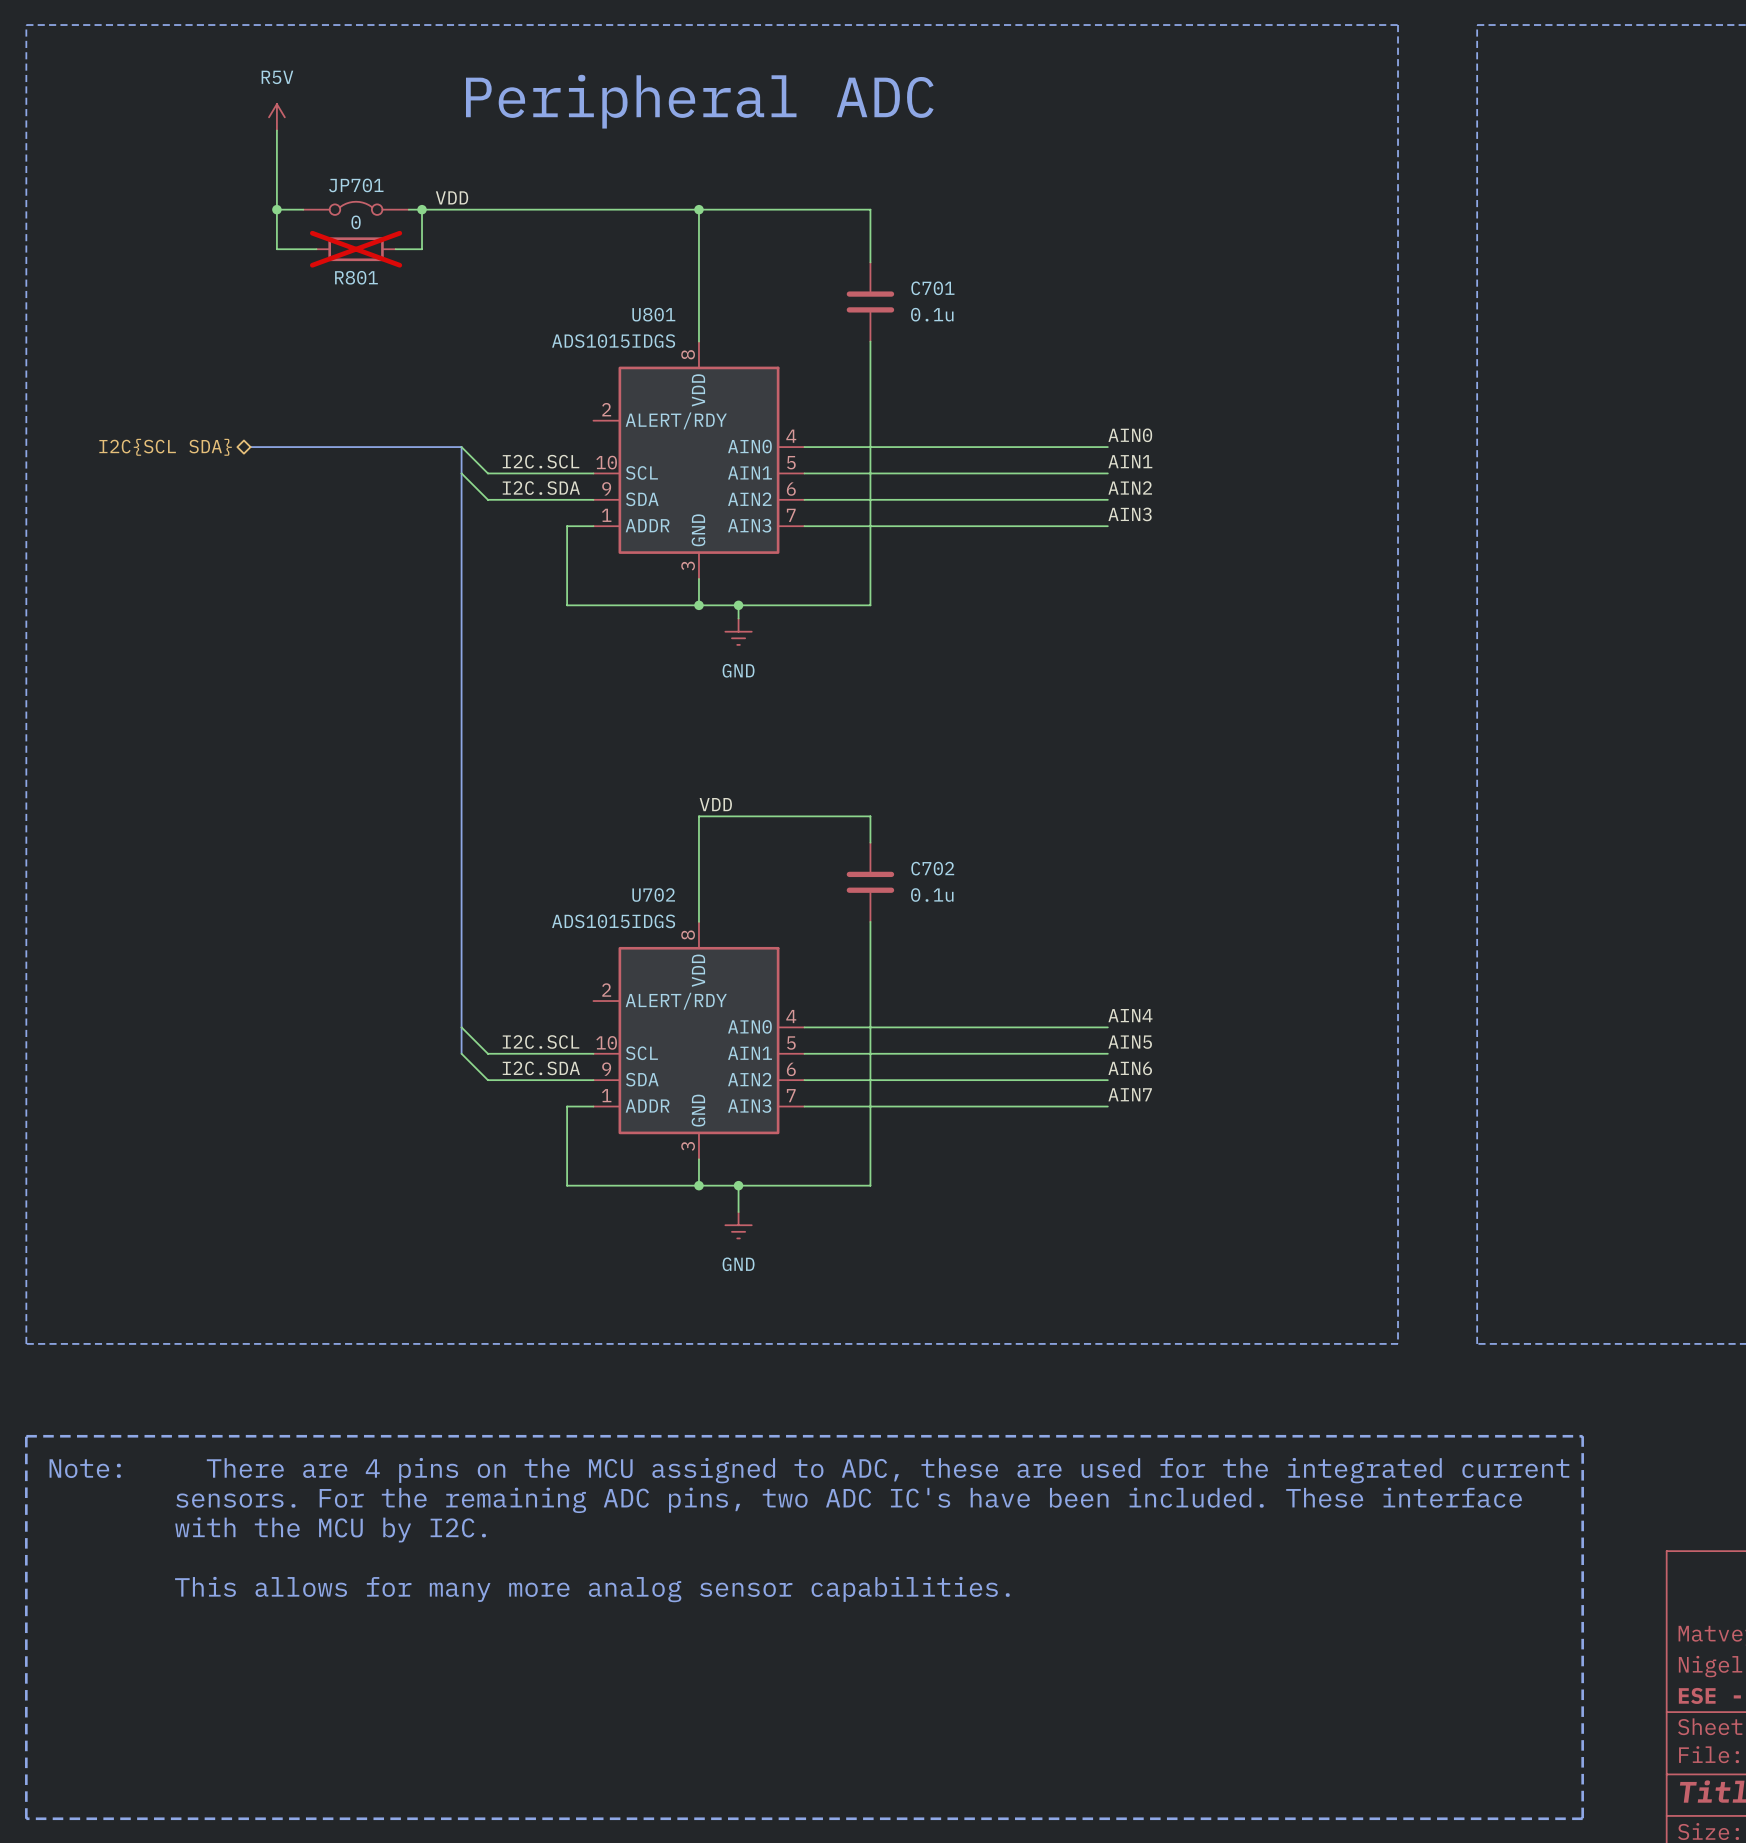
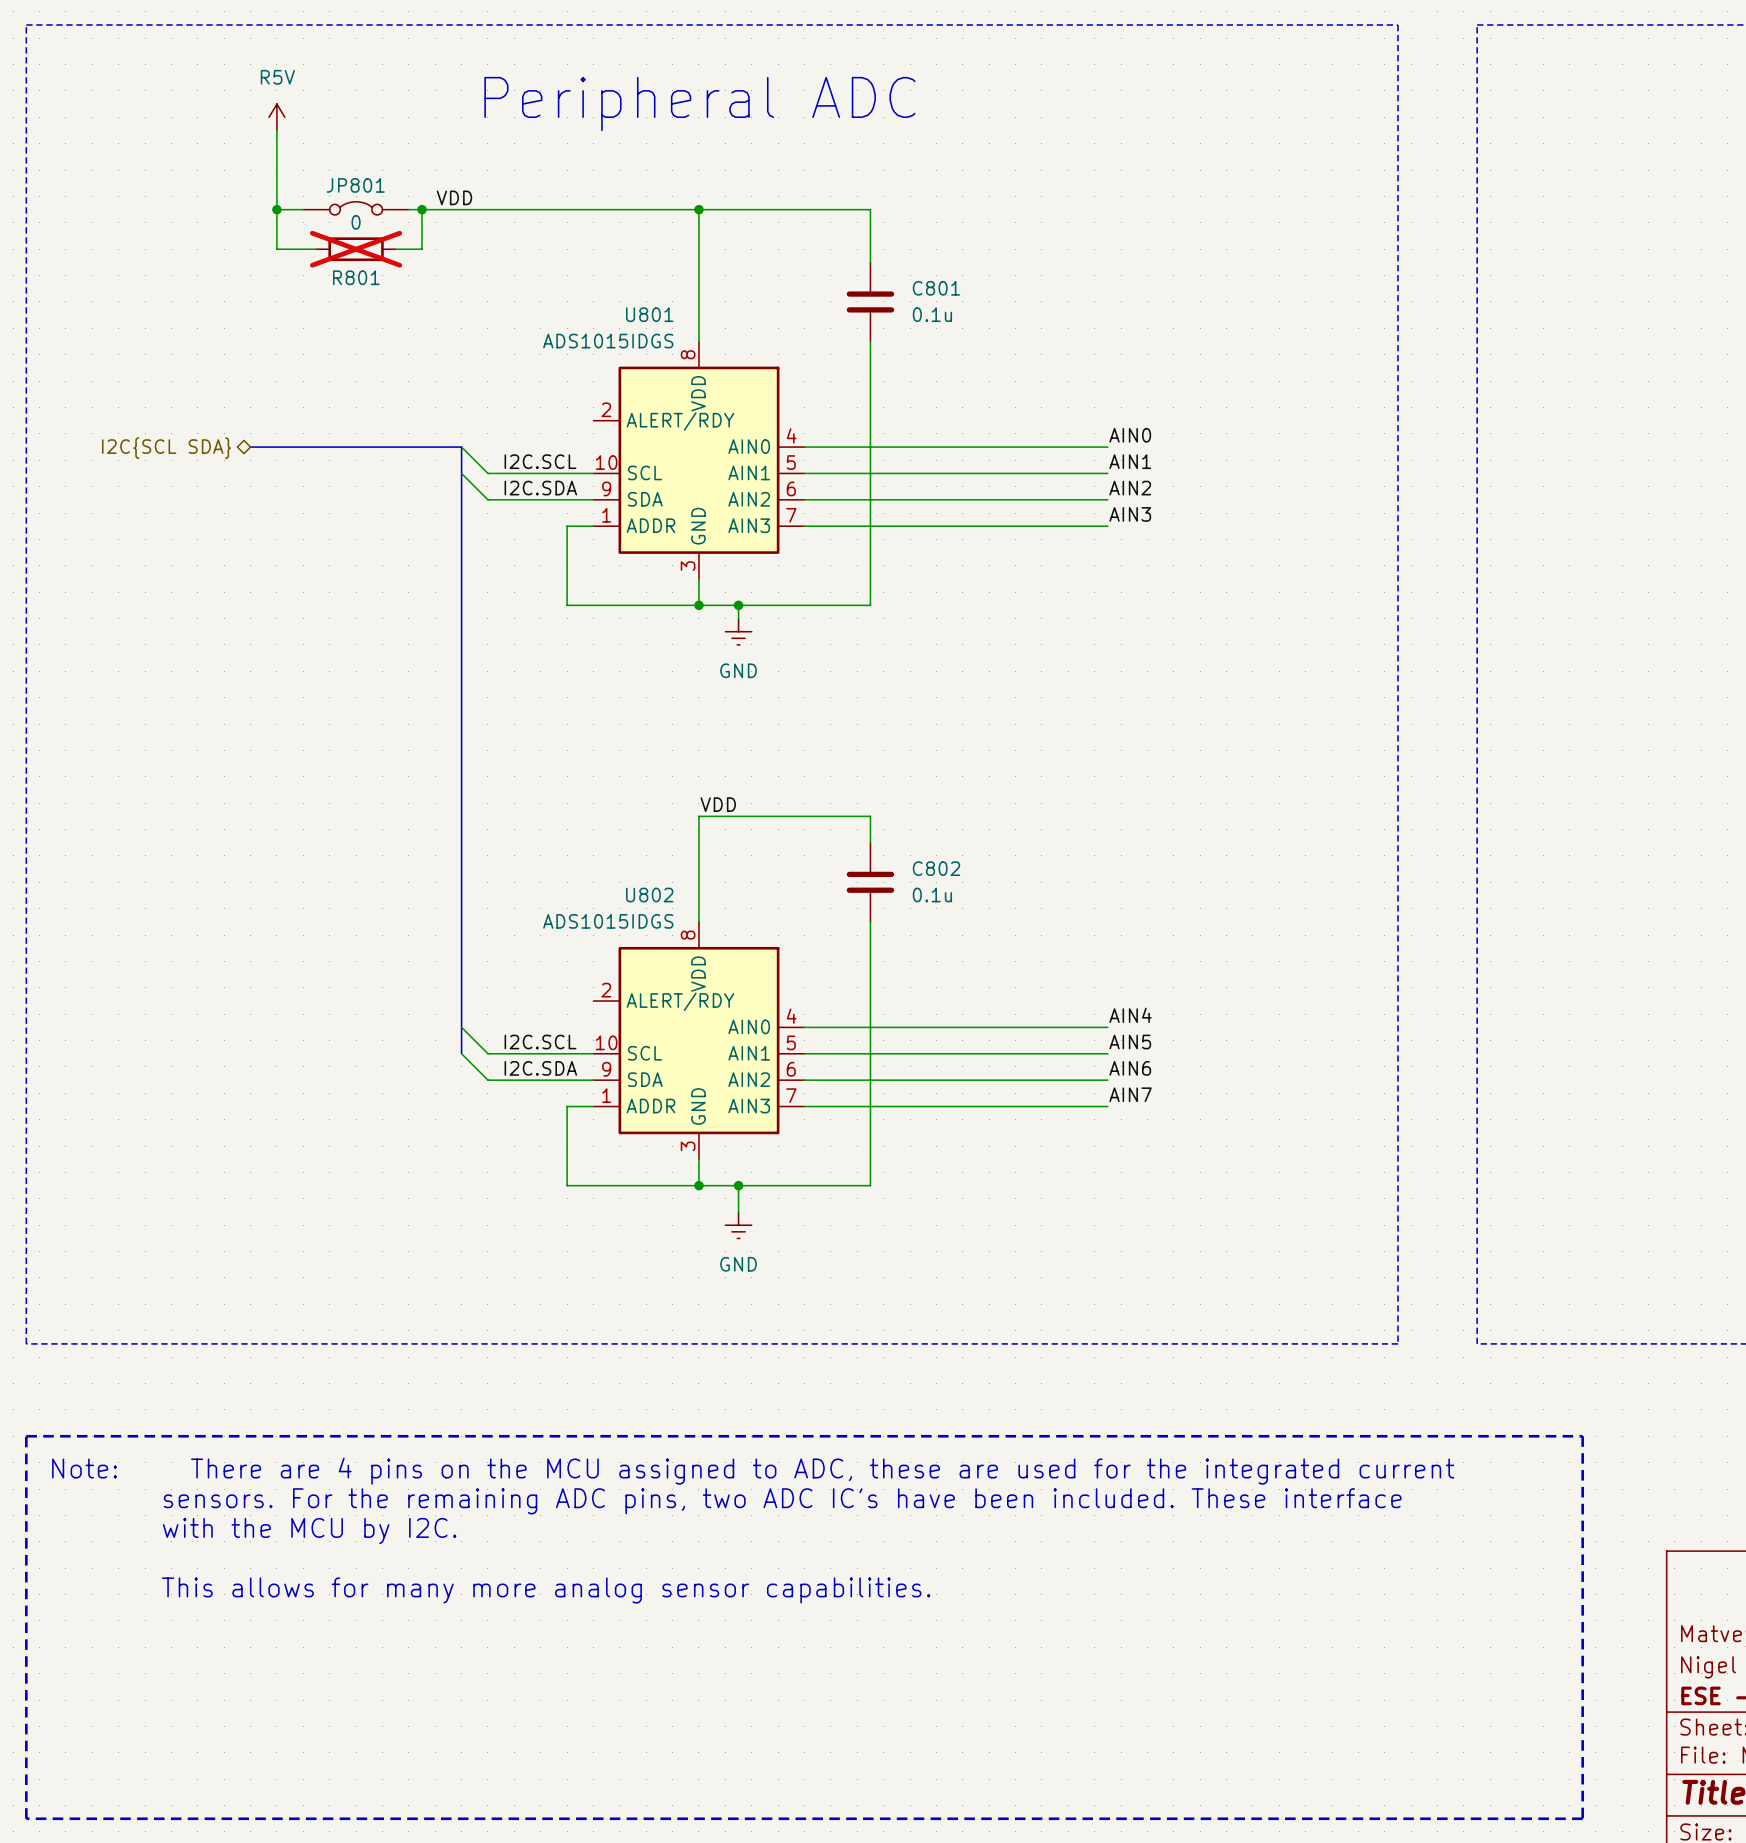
JP701 name: JP701 (356, 185) -> JP801 (355, 185)
C701 name: C701 (932, 288) -> C801 (936, 288)
C702 name: C702 (932, 868) -> C802 (936, 868)
U702 name: U702 (653, 895) -> U802 (649, 895)

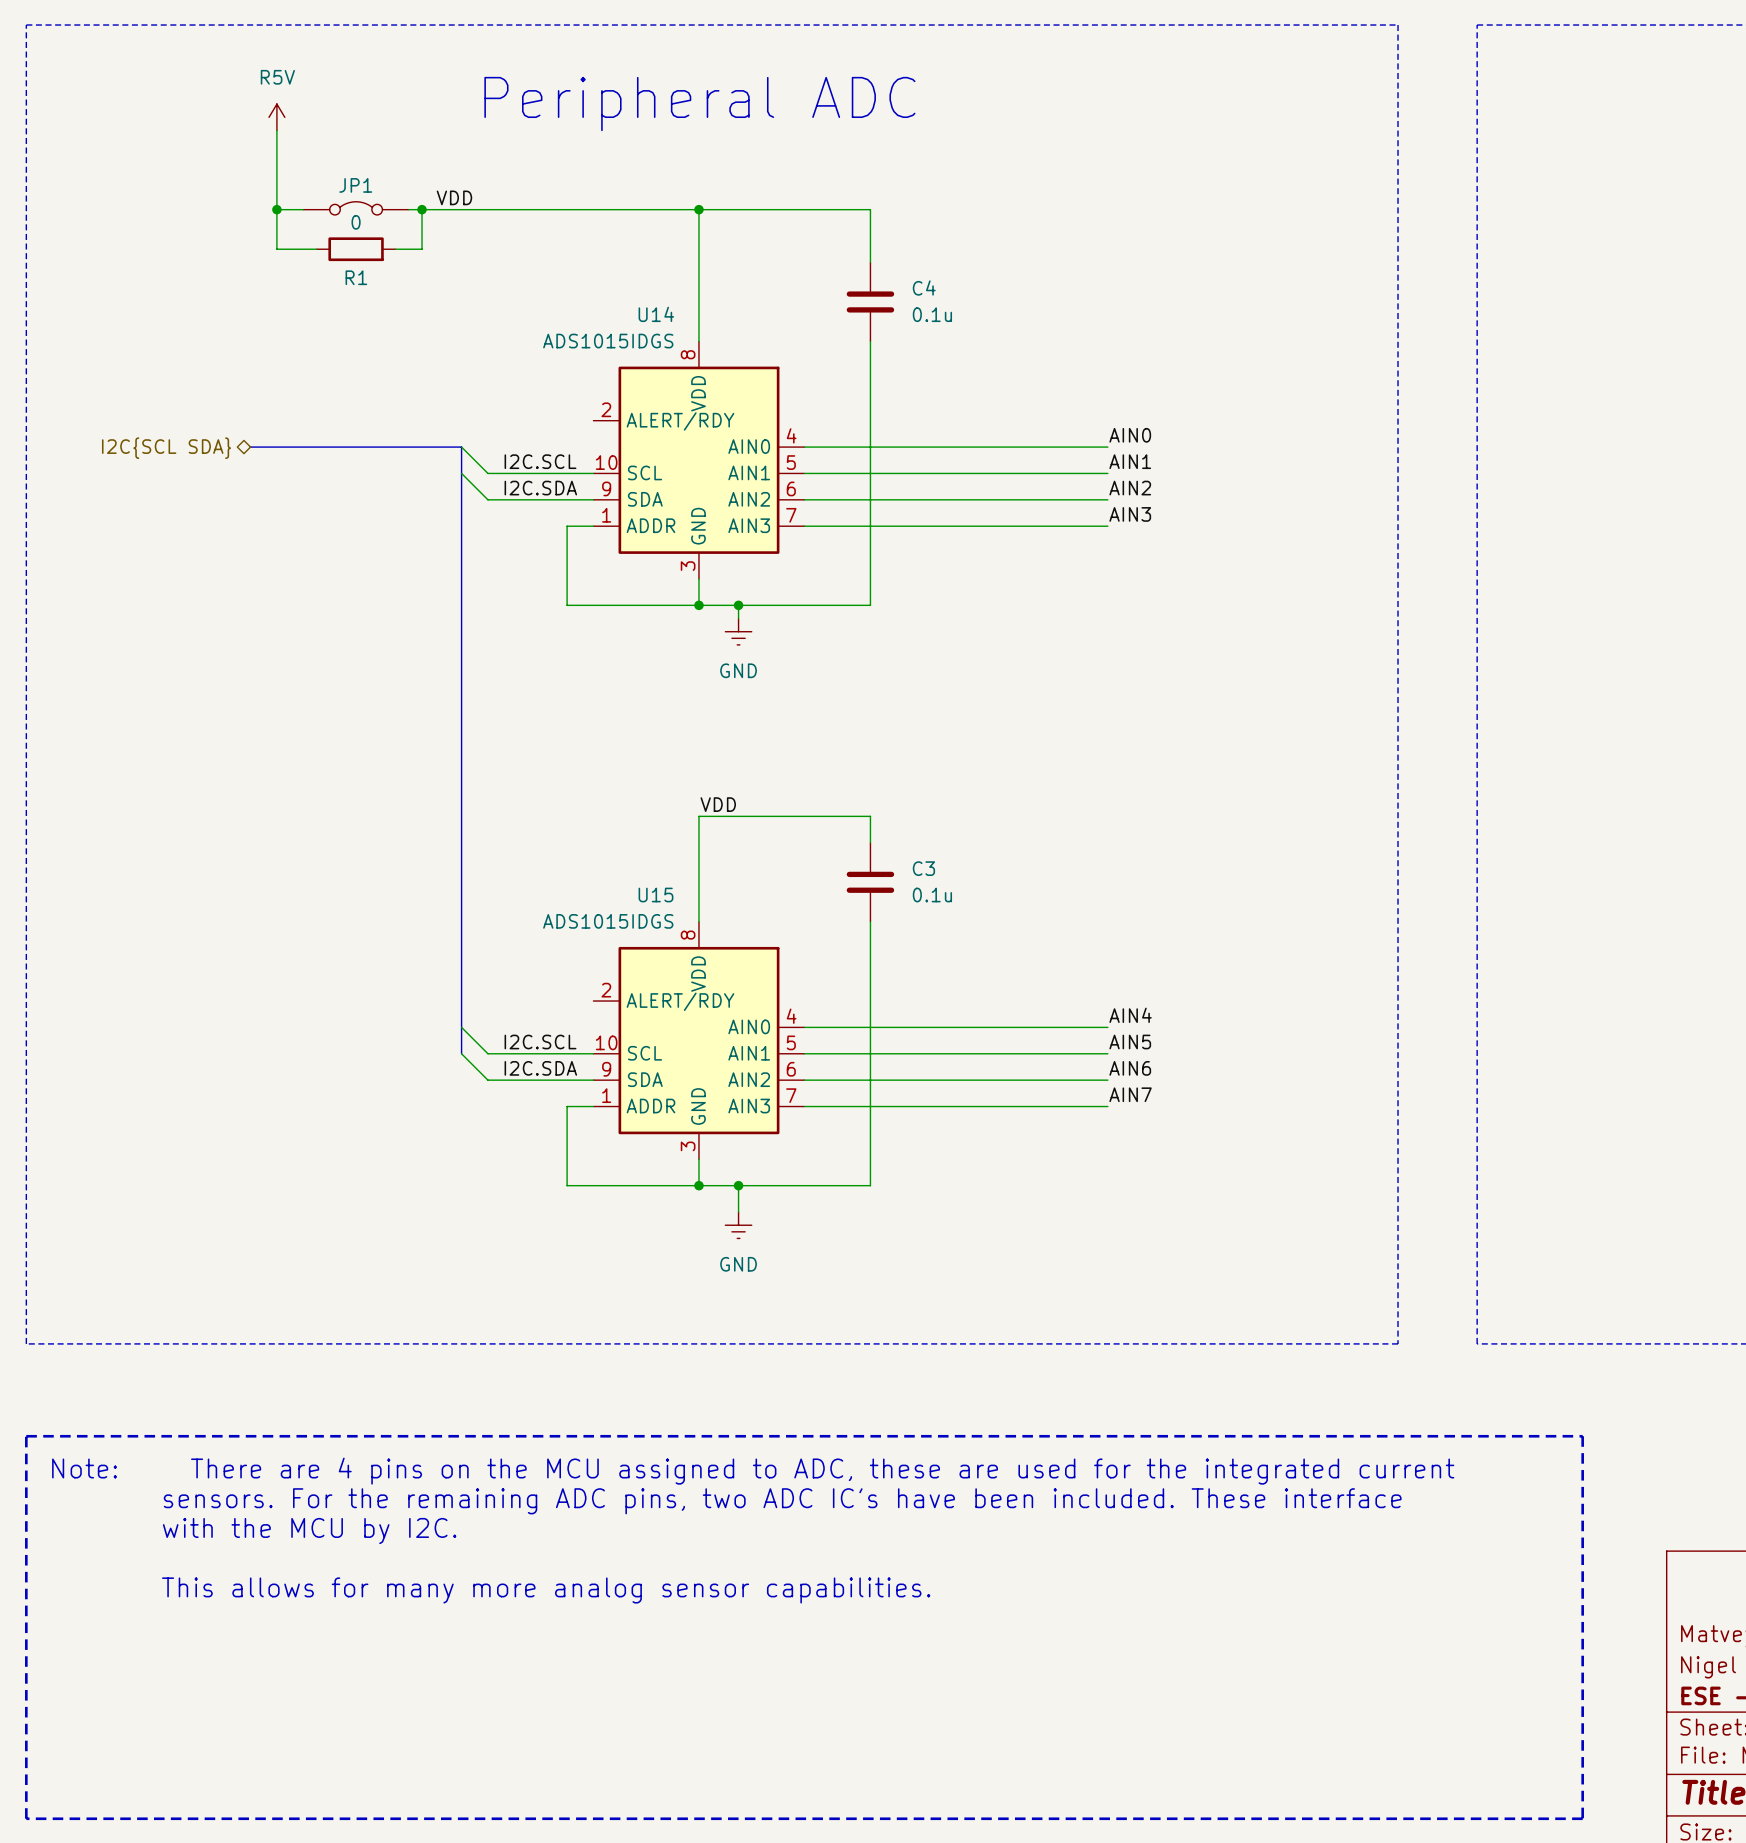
JP801 name: JP801 (355, 185) -> JP1 (355, 185)
R801 do-not-place cross: (356, 249) -> none
R801 name: R801 (356, 277) -> R1 (356, 277)
C801 name: C801 (936, 288) -> C4 (924, 287)
U801 name: U801 (649, 314) -> U14 (656, 314)
C802 name: C802 (936, 868) -> C3 (923, 868)
U802 name: U802 (649, 895) -> U15 (656, 895)

